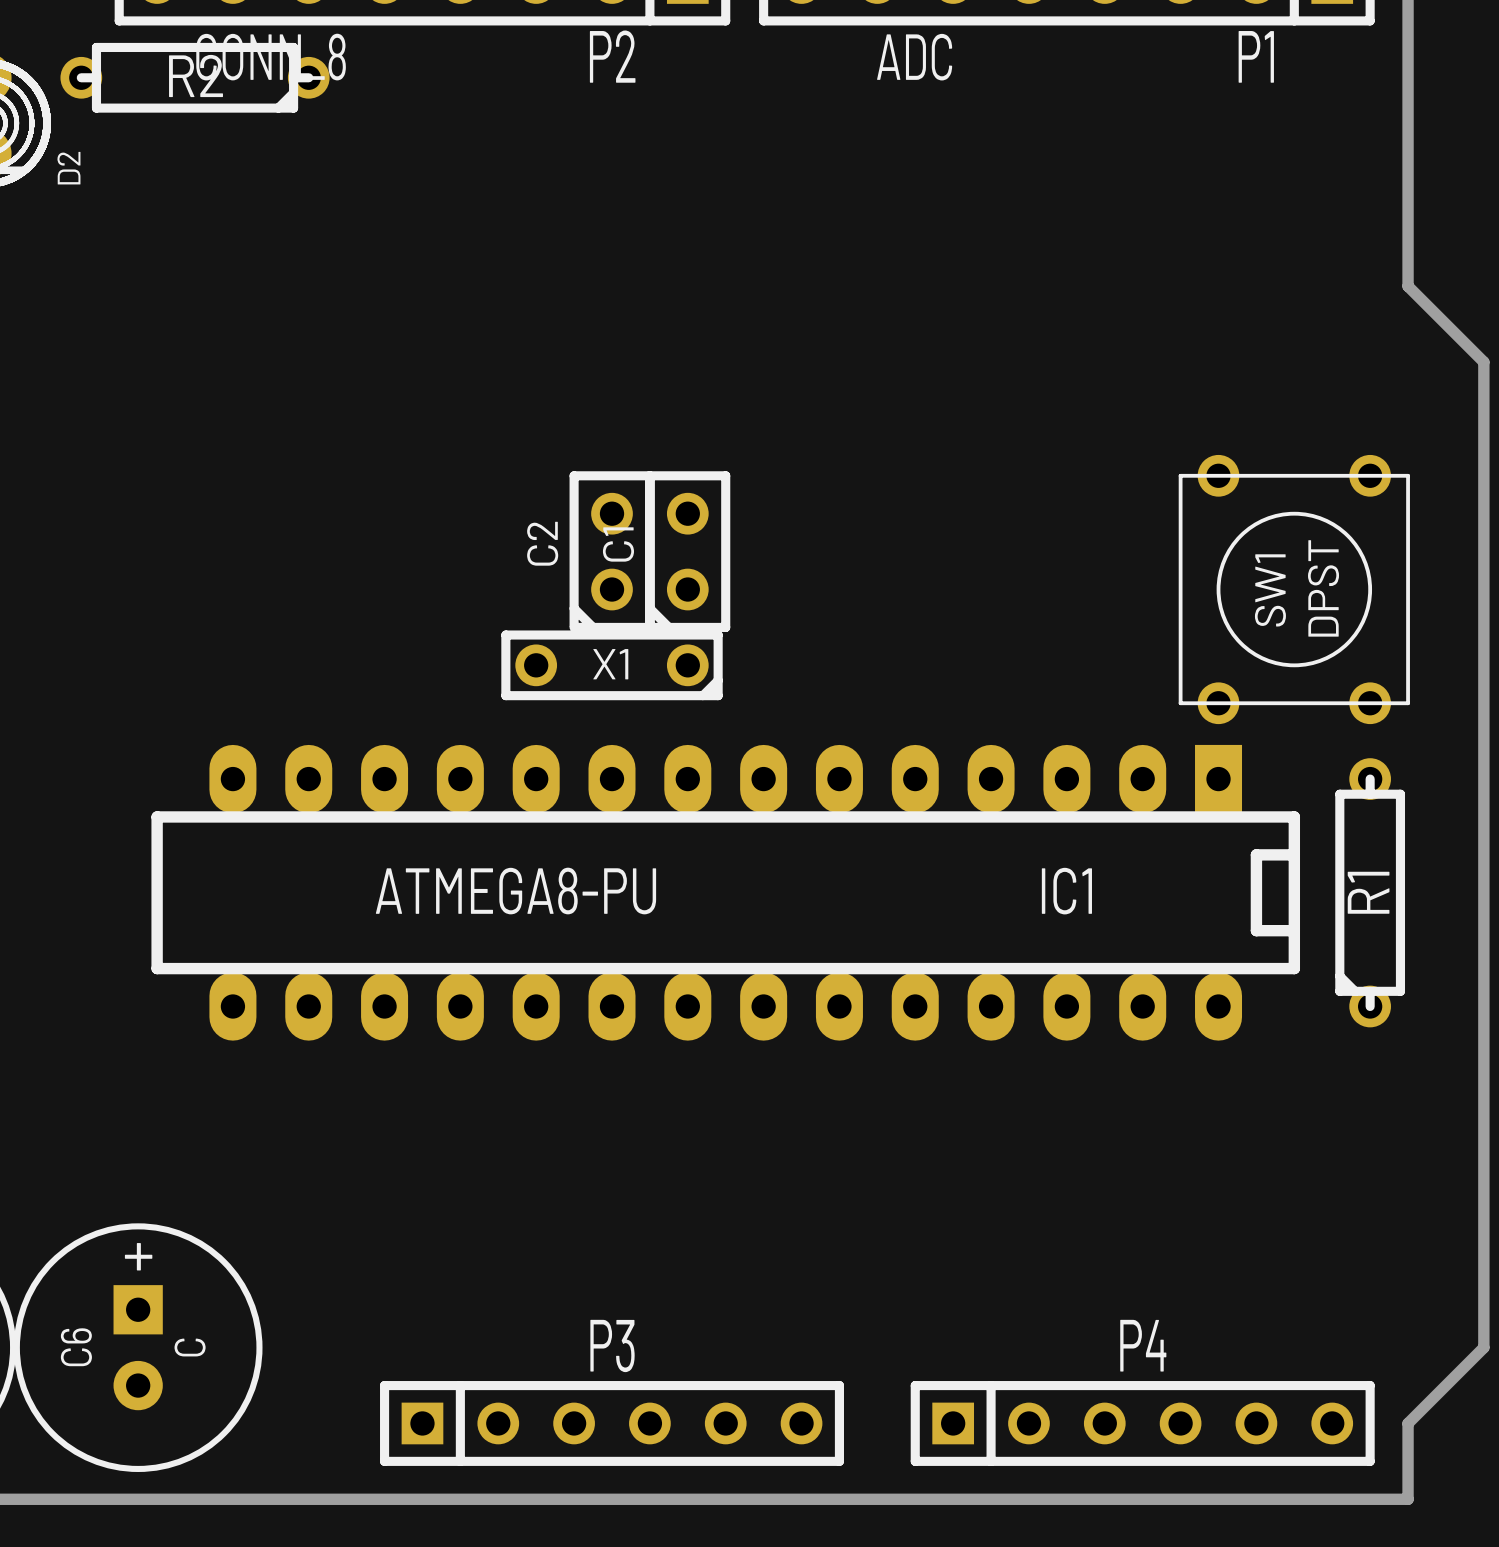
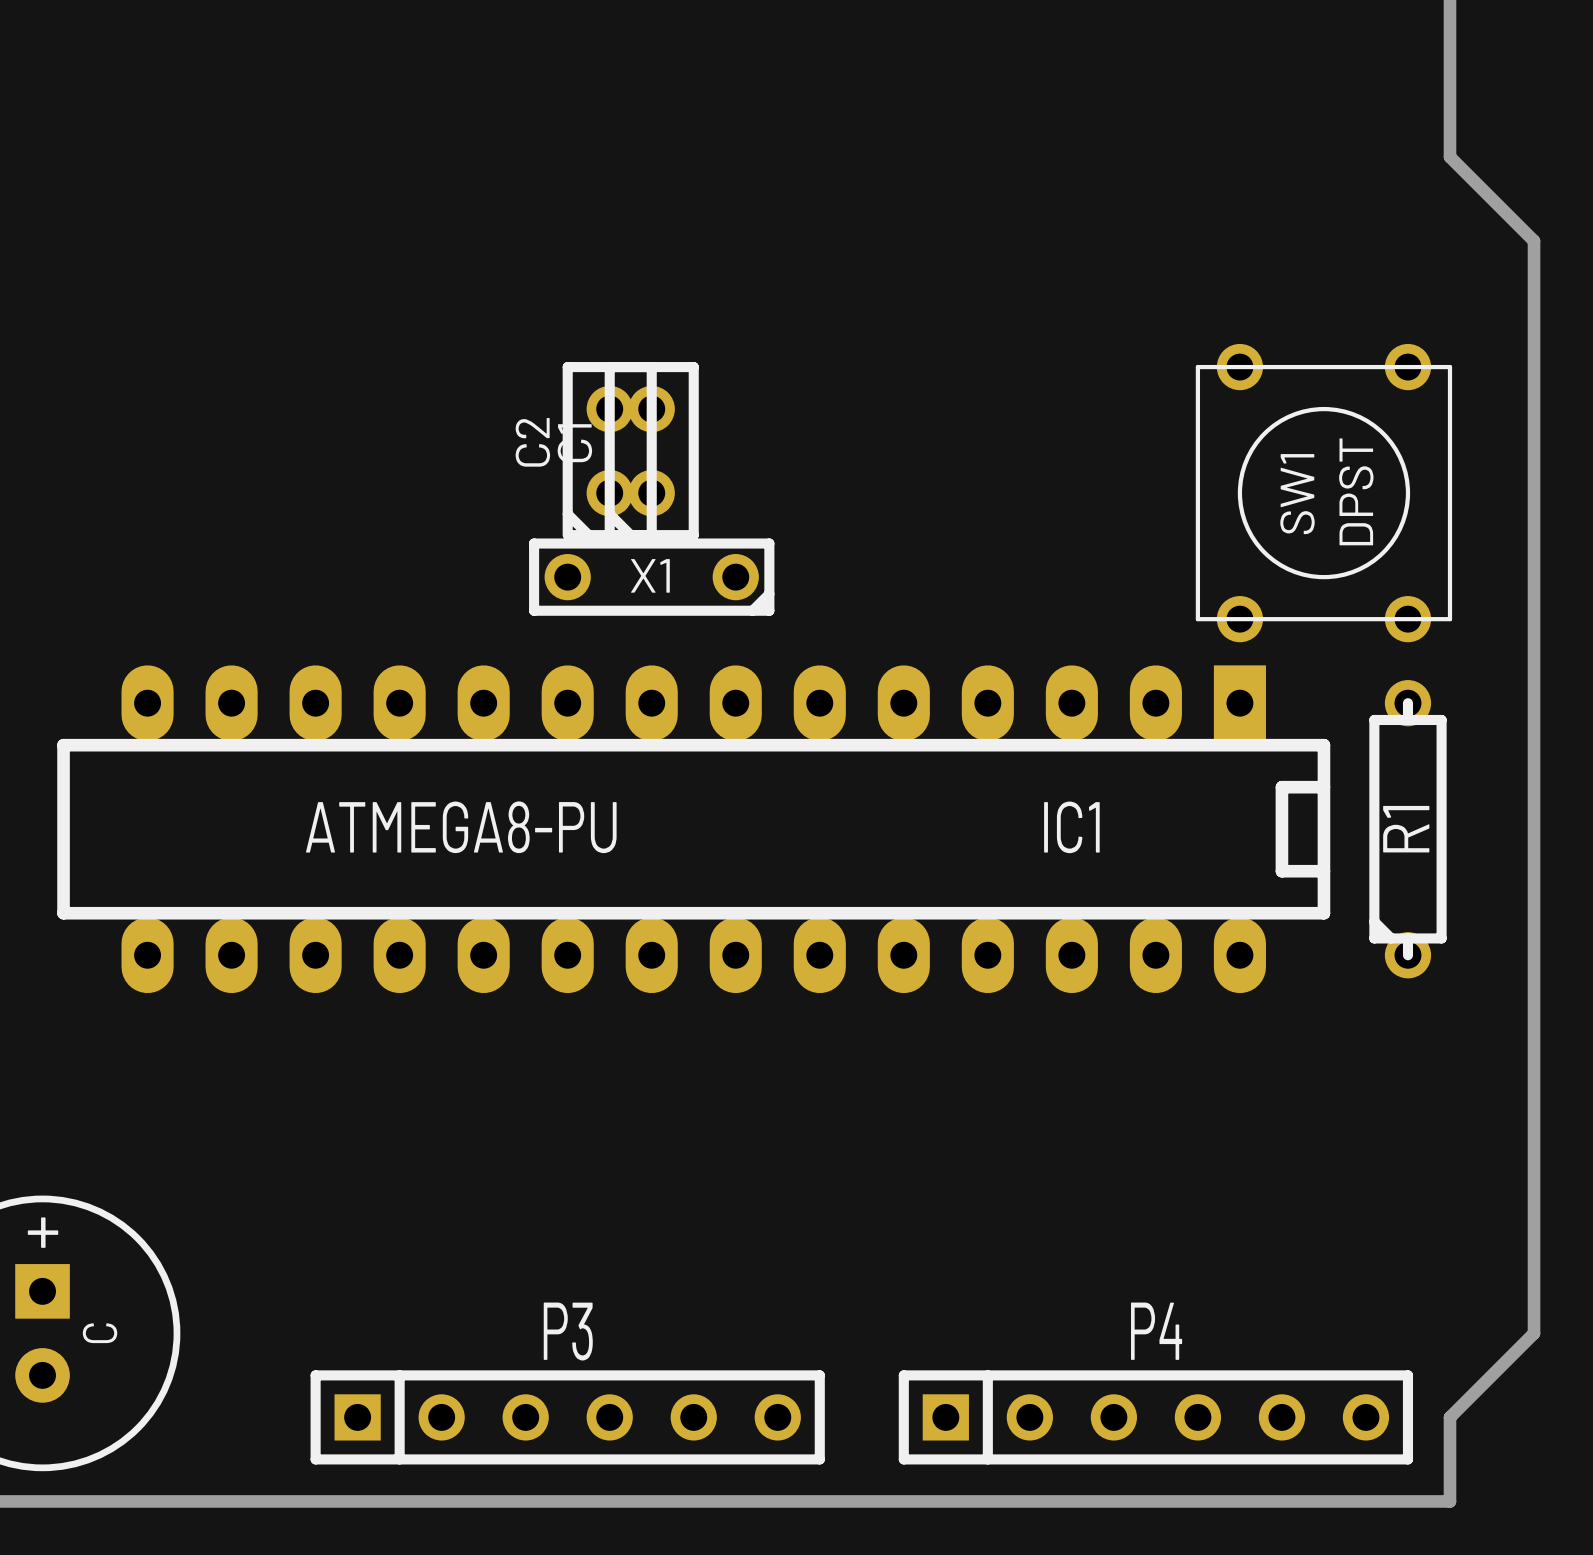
C2 position: (612, 551) -> (609, 451)
X1 position: (612, 665) -> (651, 577)

